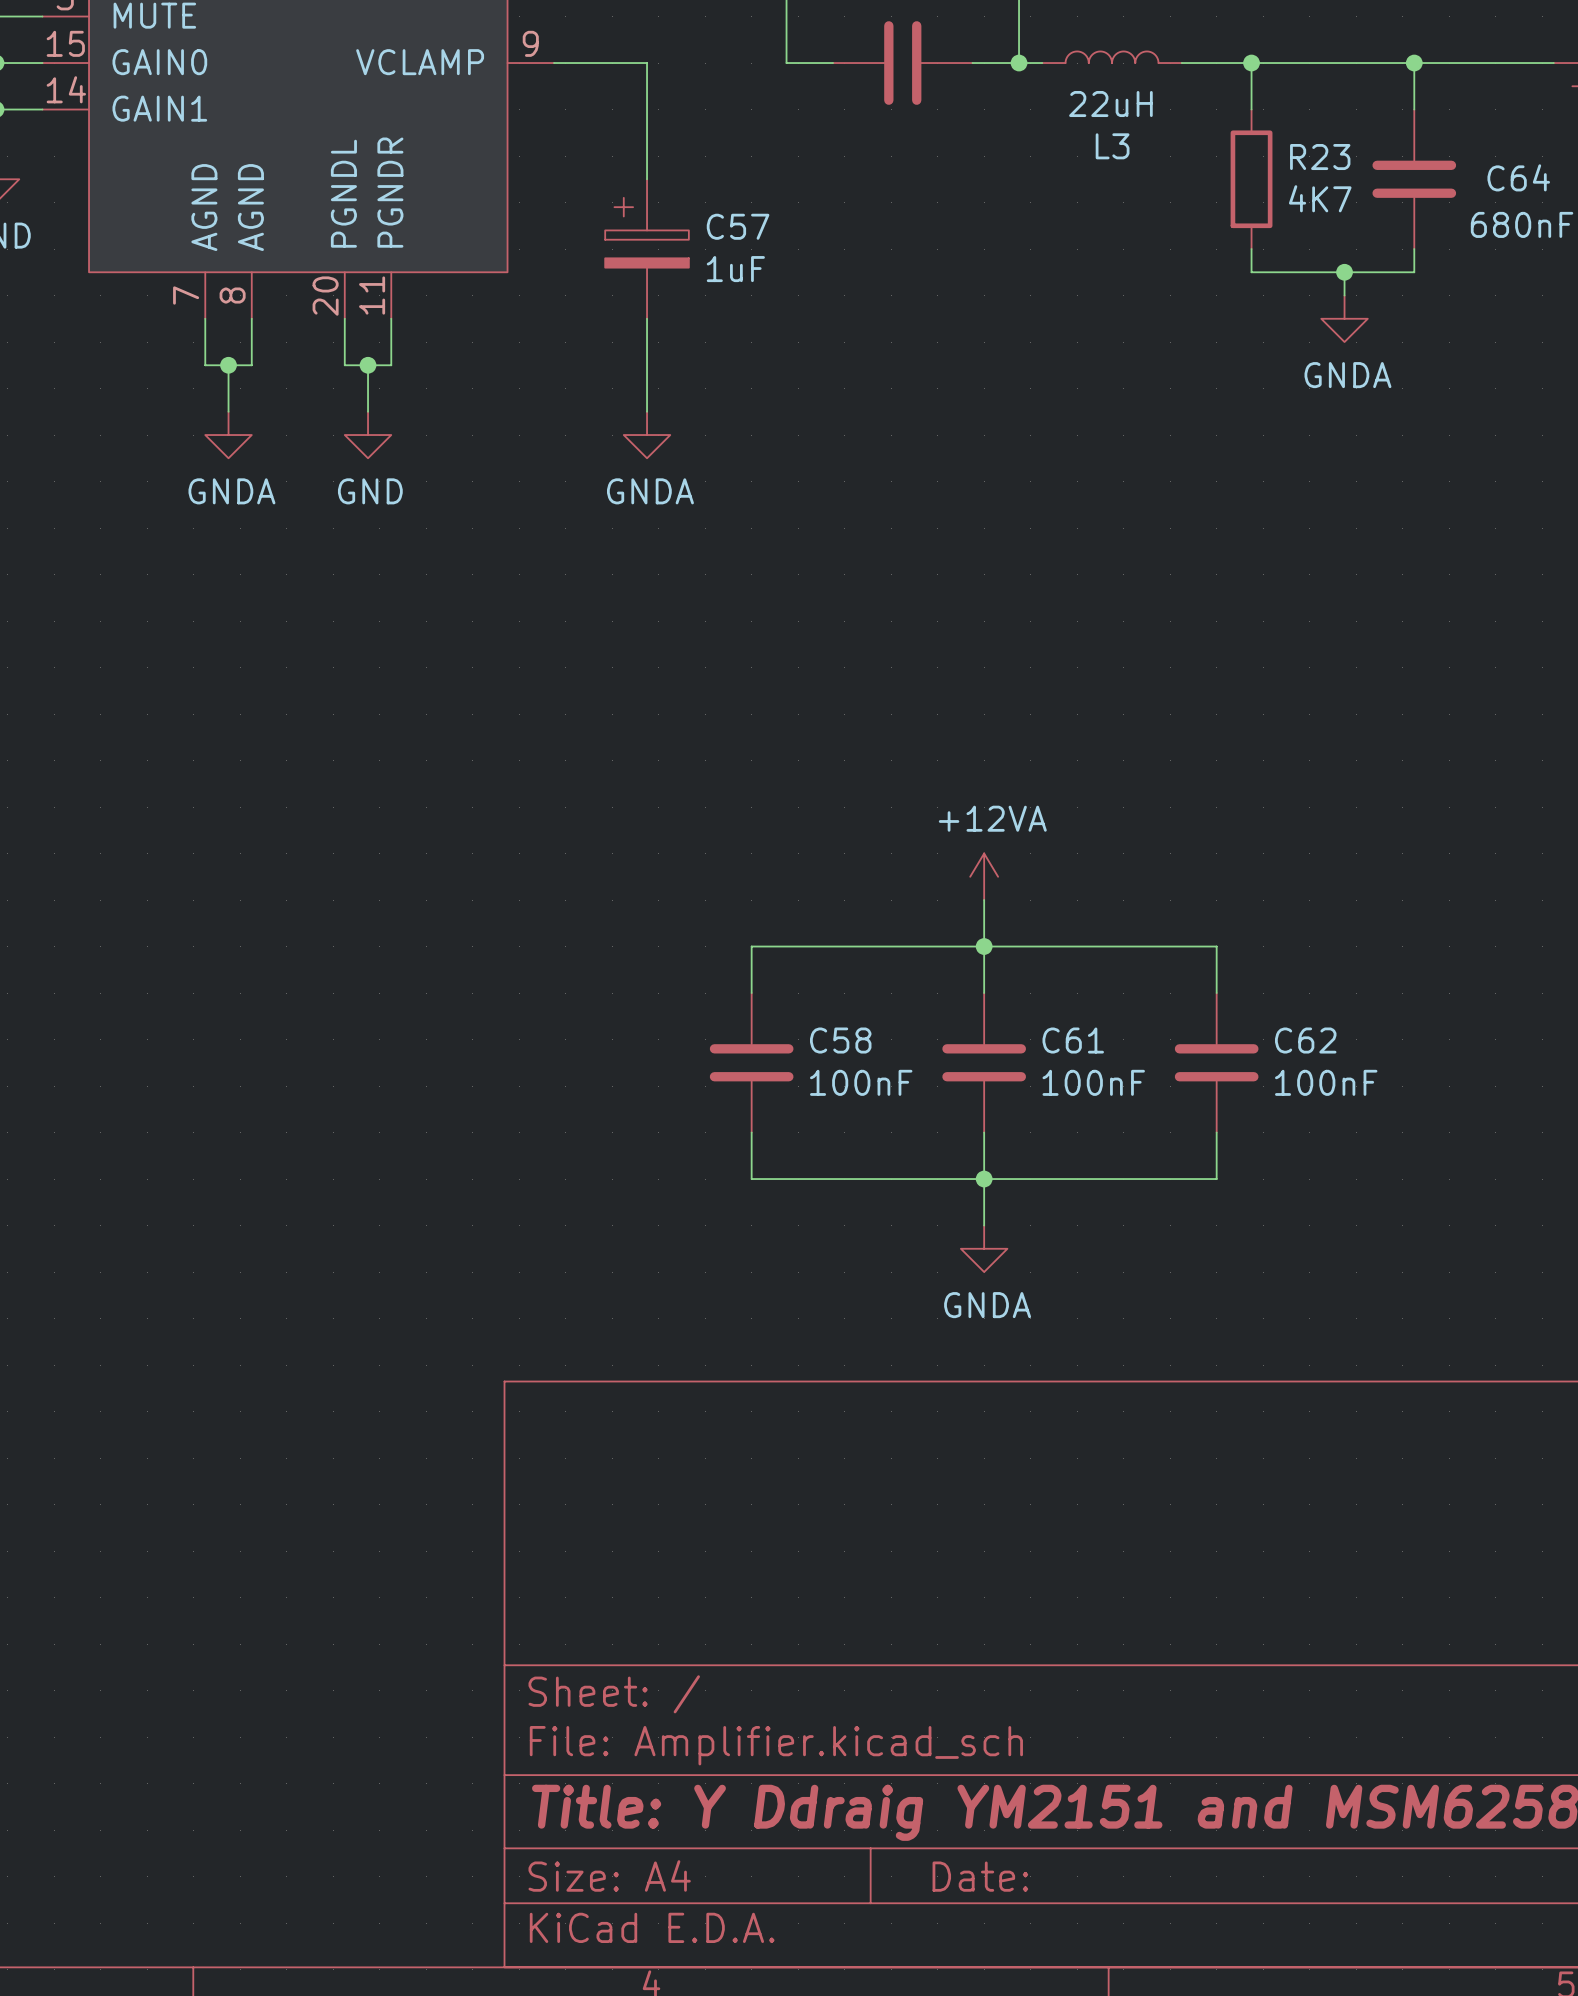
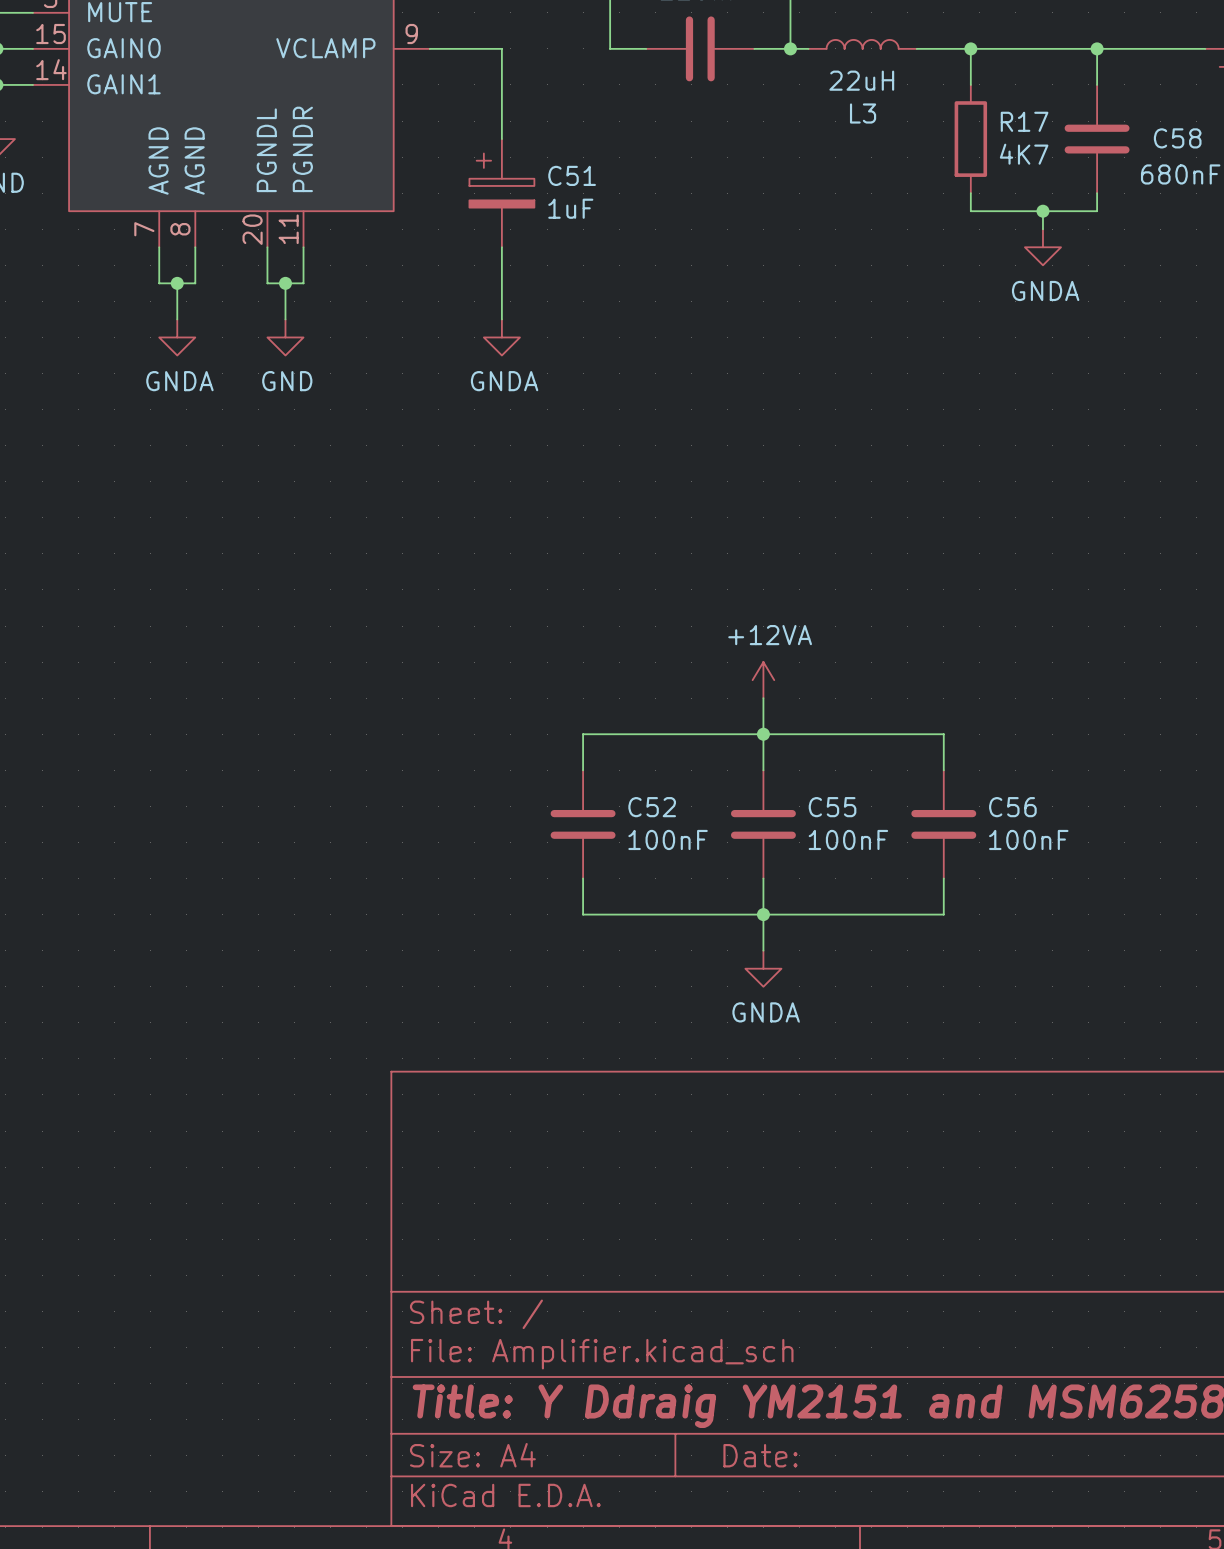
R23 name: R23 (1320, 157) -> R17 (1024, 121)
C64 name: C64 (1518, 177) -> C58 (1177, 138)
C57 name: C57 (738, 226) -> C51 (572, 175)
C58 name: C58 (840, 1040) -> C52 (652, 807)
C61 name: C61 (1073, 1040) -> C55 (832, 807)
C62 name: C62 (1305, 1040) -> C56 (1012, 807)

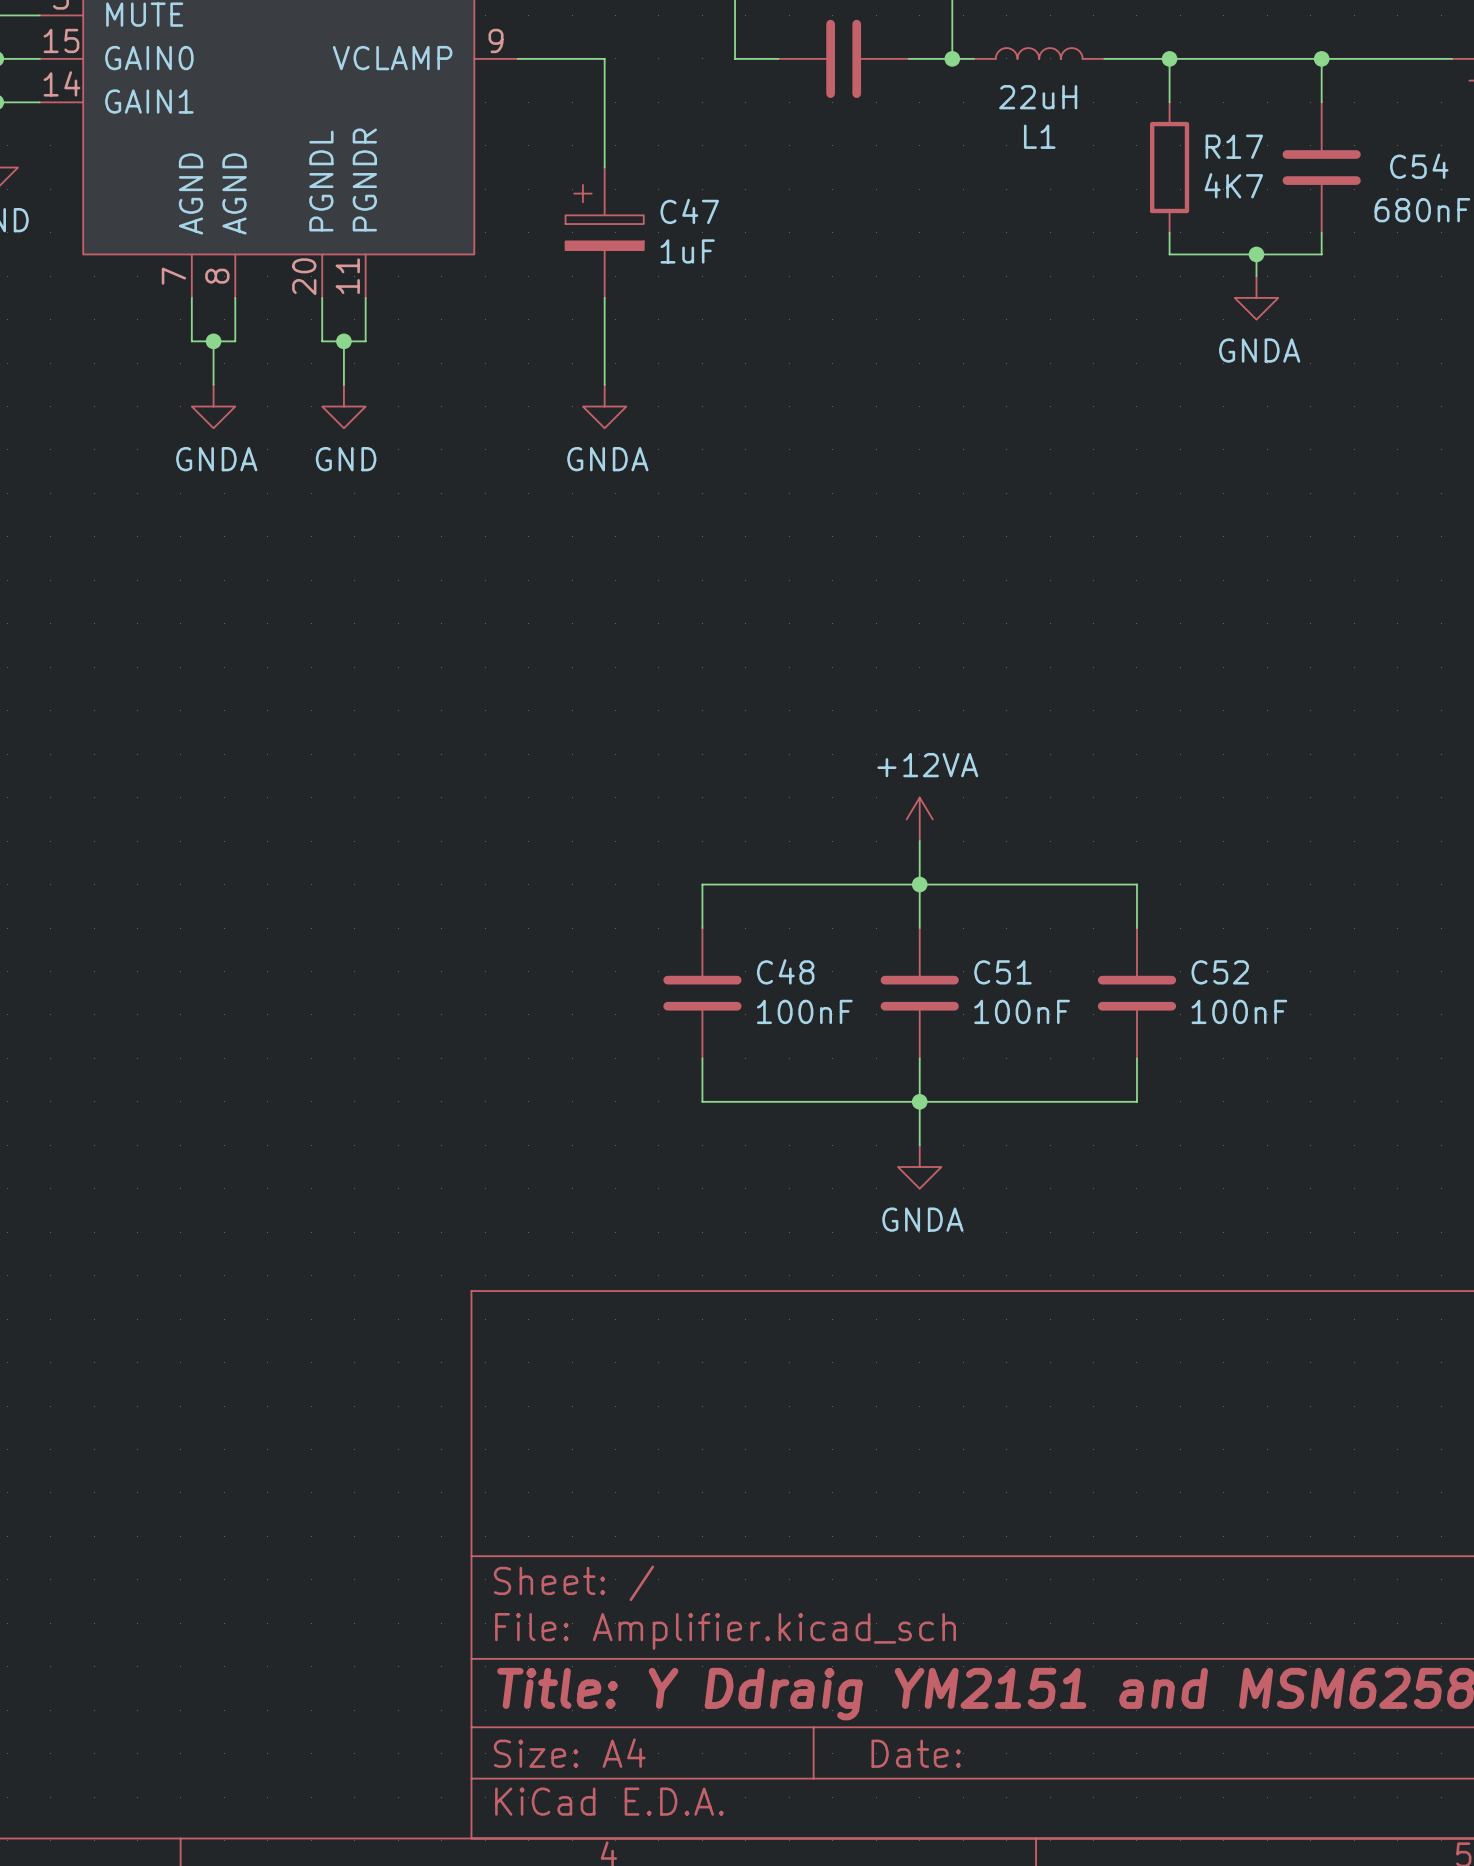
L3 name: L3 (863, 113) -> L1 (1039, 136)
C58 name: C58 (1177, 138) -> C54 (1419, 166)
C51 name: C51 (572, 175) -> C47 (689, 211)
C52 name: C52 (652, 807) -> C48 (785, 971)
C55 name: C55 (832, 807) -> C51 (1002, 972)
C56 name: C56 (1012, 807) -> C52 (1220, 972)

